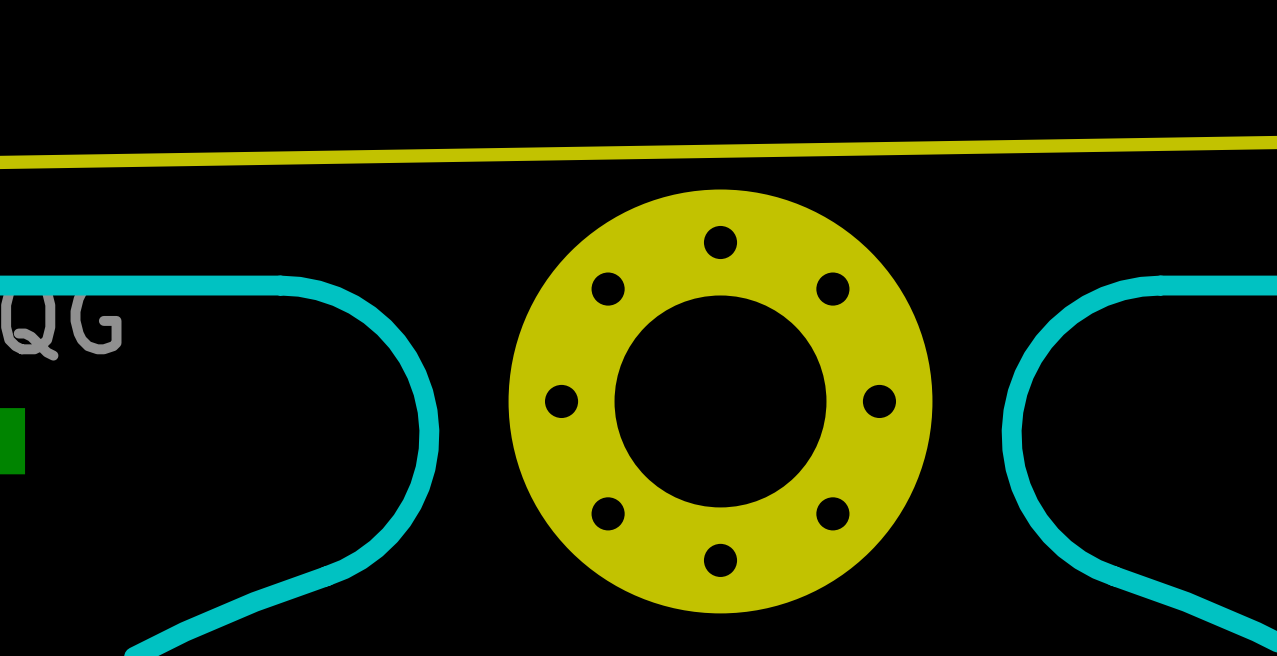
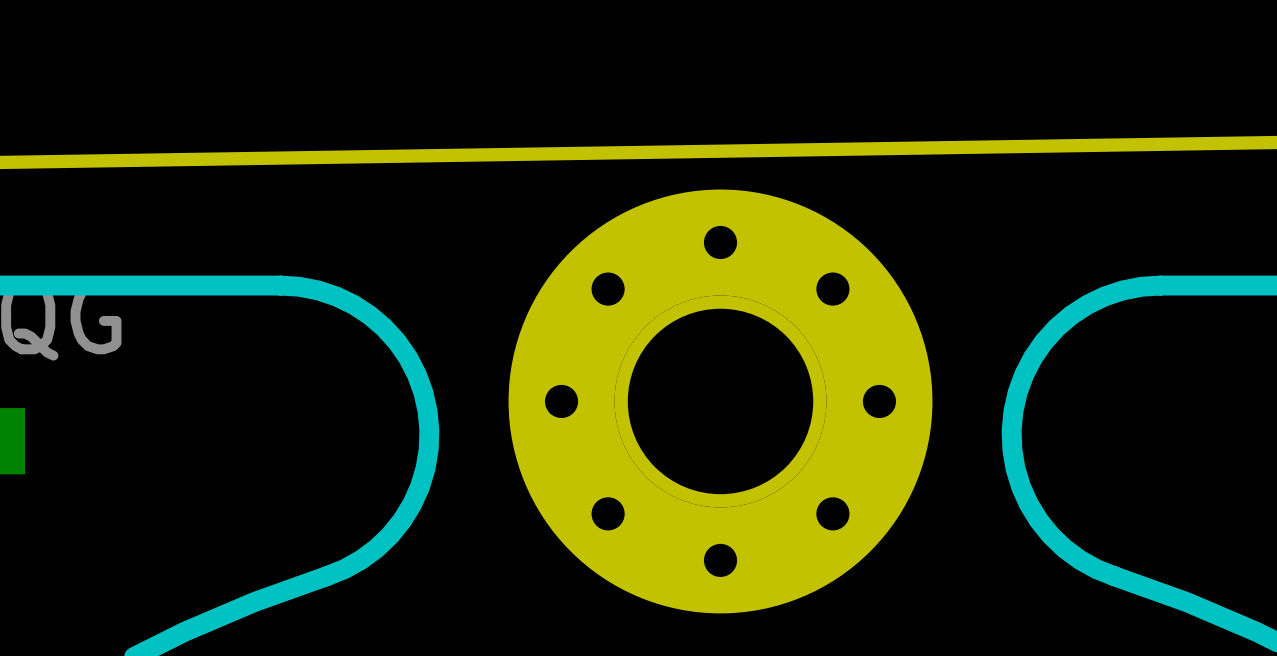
round board edge: none -> [614, 295, 827, 508]

